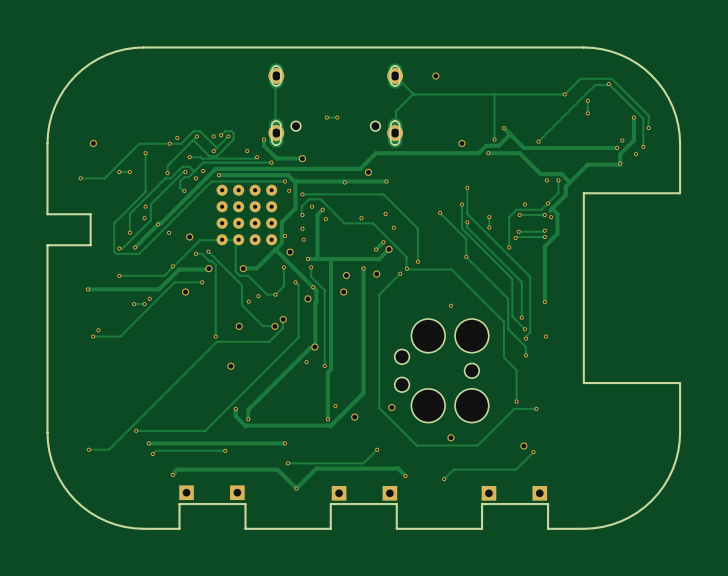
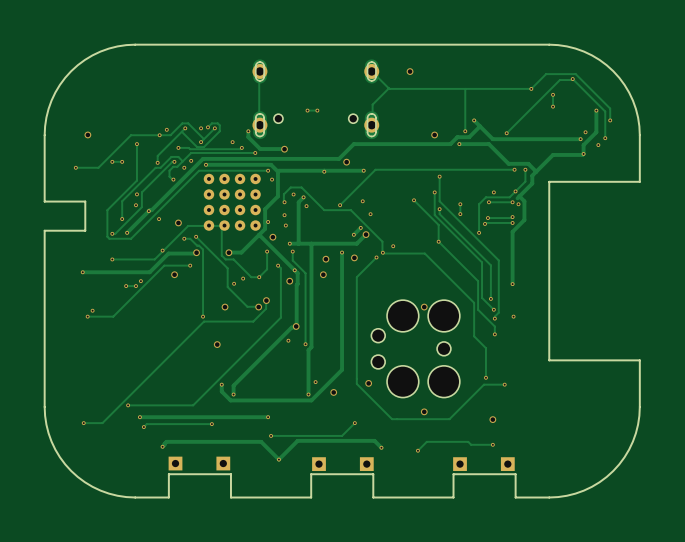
track: none -> (514, 169) (375, 169) (340, 205)
track: (302, 194) (383, 194) (417, 228) (417, 261) -> none
via: (302, 194) -> none
via: (450, 305) -> none
via: none -> (424, 307)
track: (533, 452) (516, 469) (497, 469) -> (492, 444) (471, 444) (468, 441)
via position: (533, 452) -> (492, 444)

